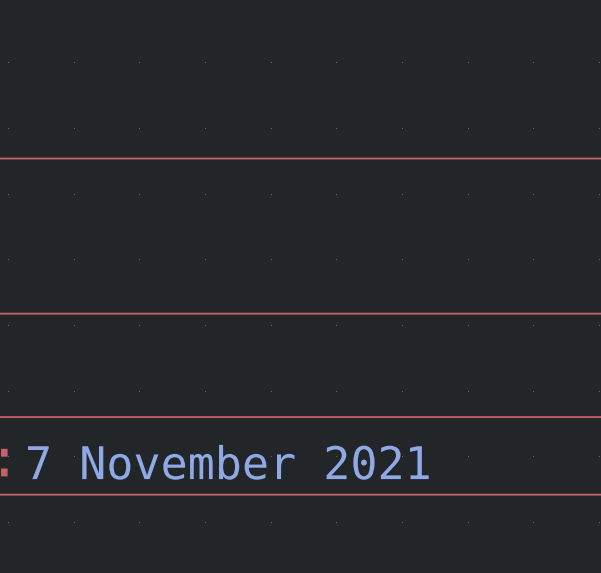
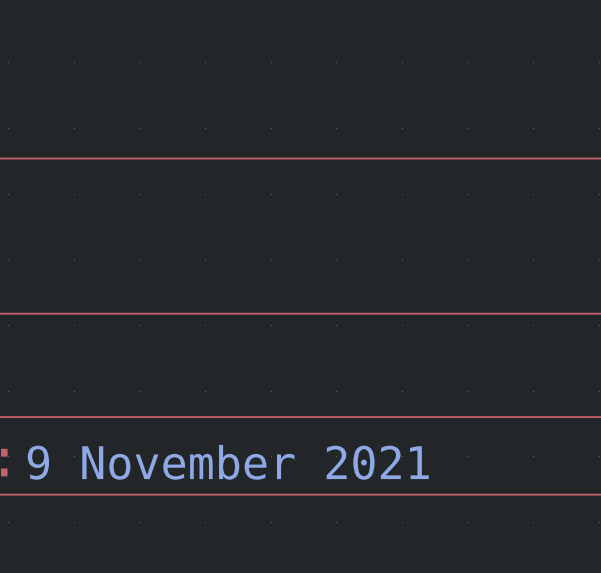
text: 7 November 2021 (228, 462) -> 9 November 2021 (228, 462)

